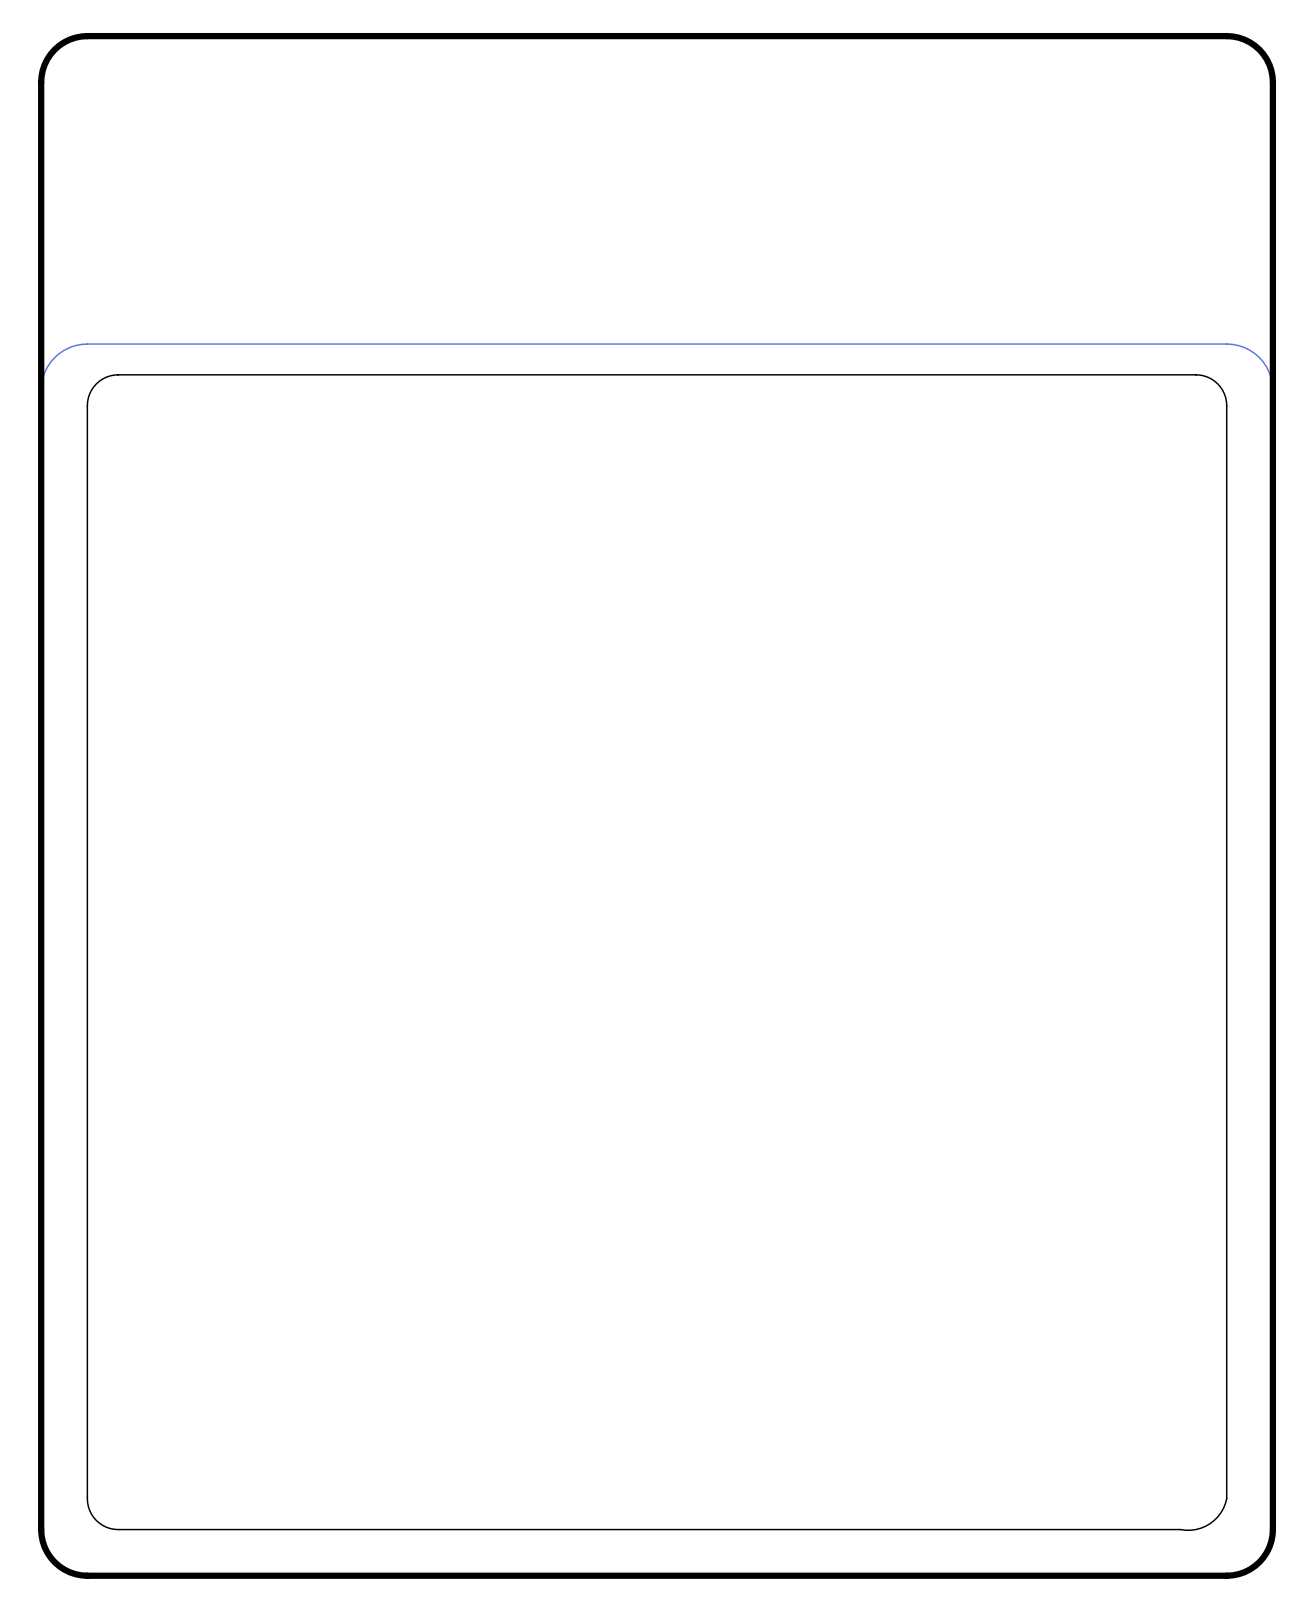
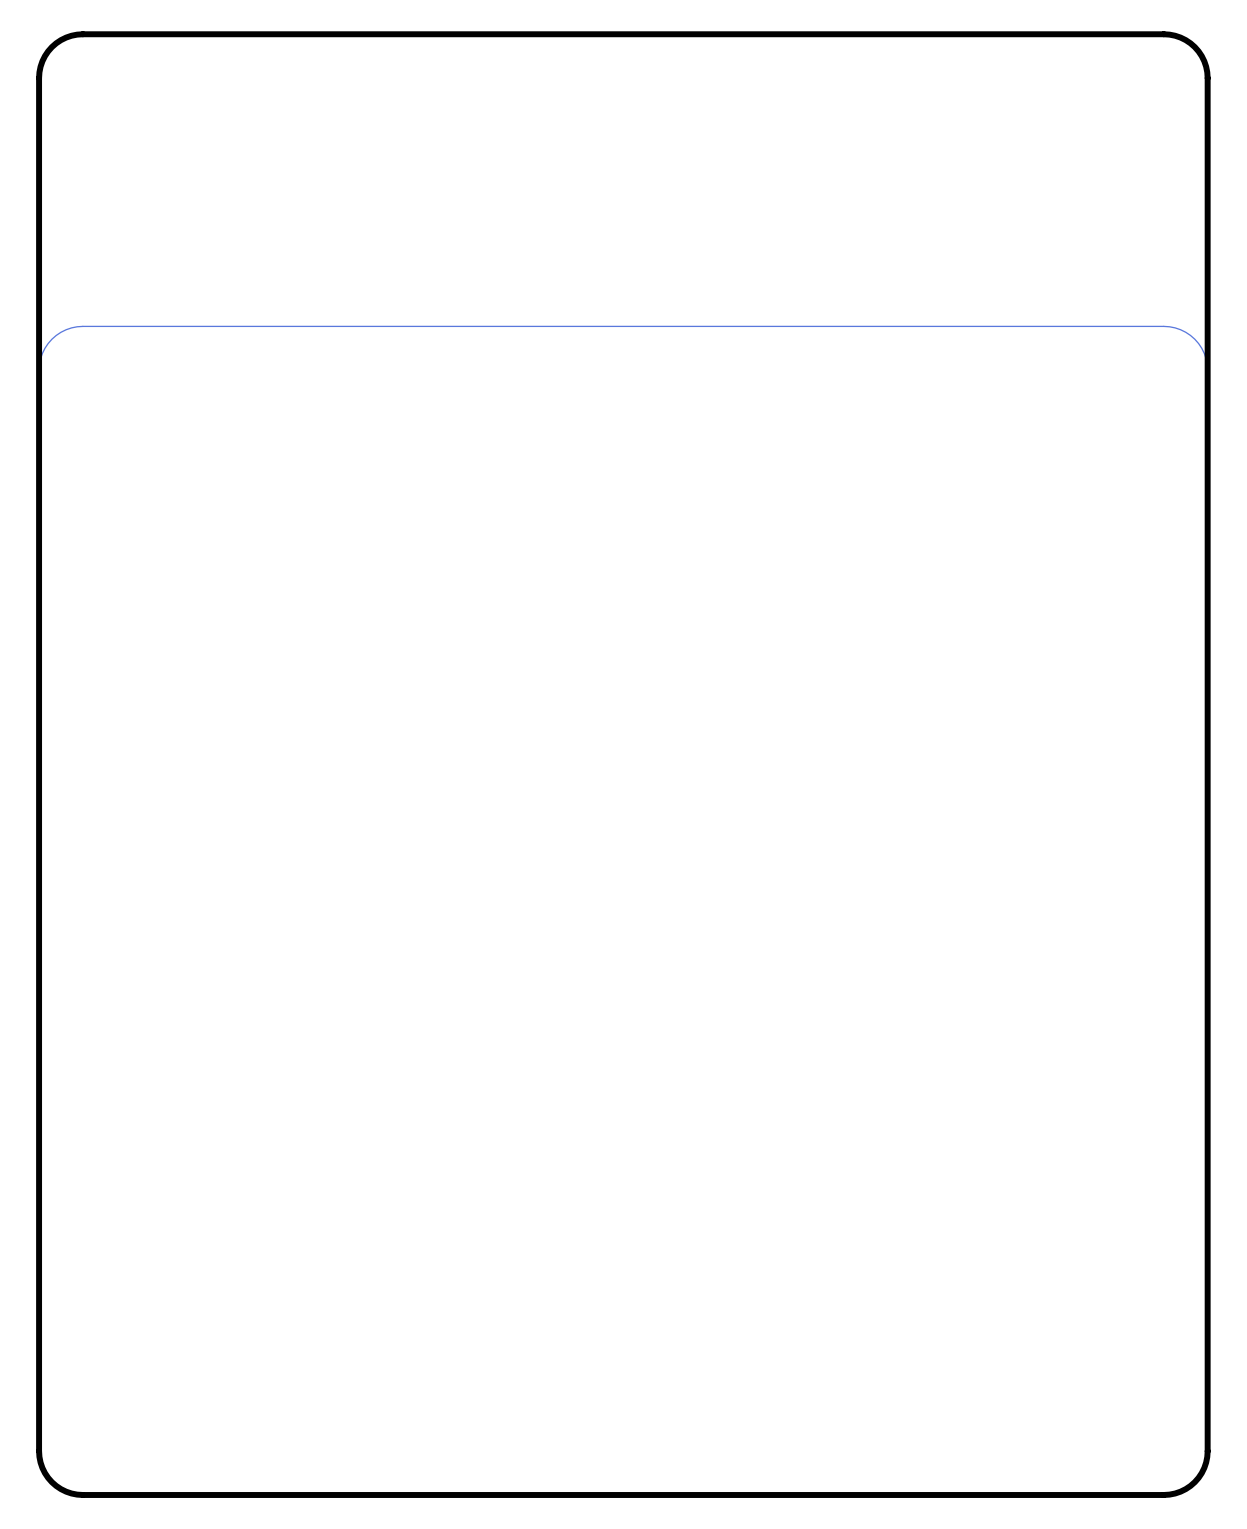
board edge: (1195, 374) (118, 374) (106, 377) (96, 383) (89, 393) (87, 405) (87, 1498) (89, 1510) (96, 1520) (106, 1527) (118, 1529) (1190, 1530) (1205, 1526) (1217, 1516) (1226, 1498) (1226, 405) (1224, 393) (1217, 383) (1207, 377) (1195, 374) -> none

